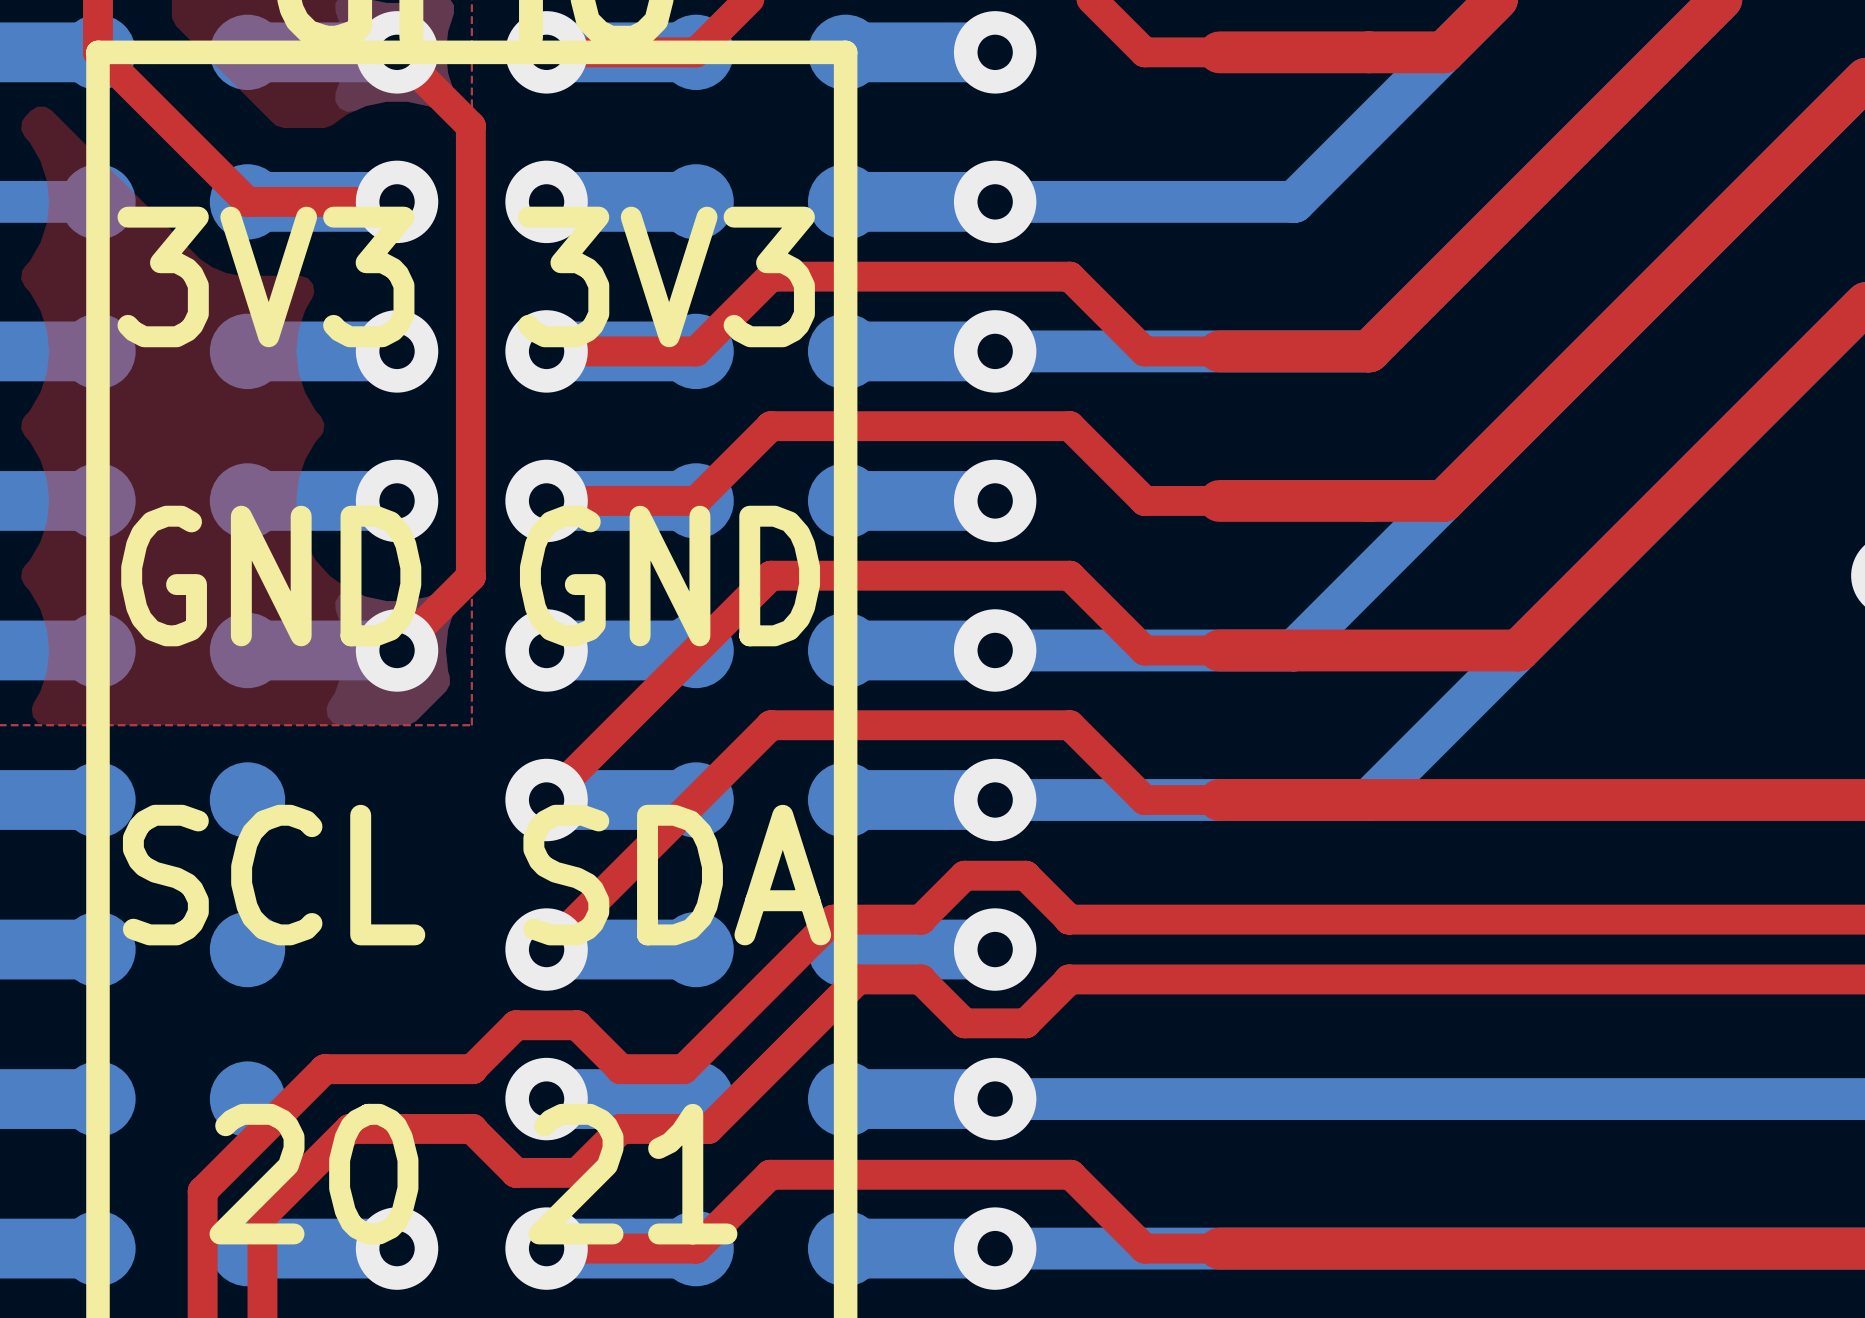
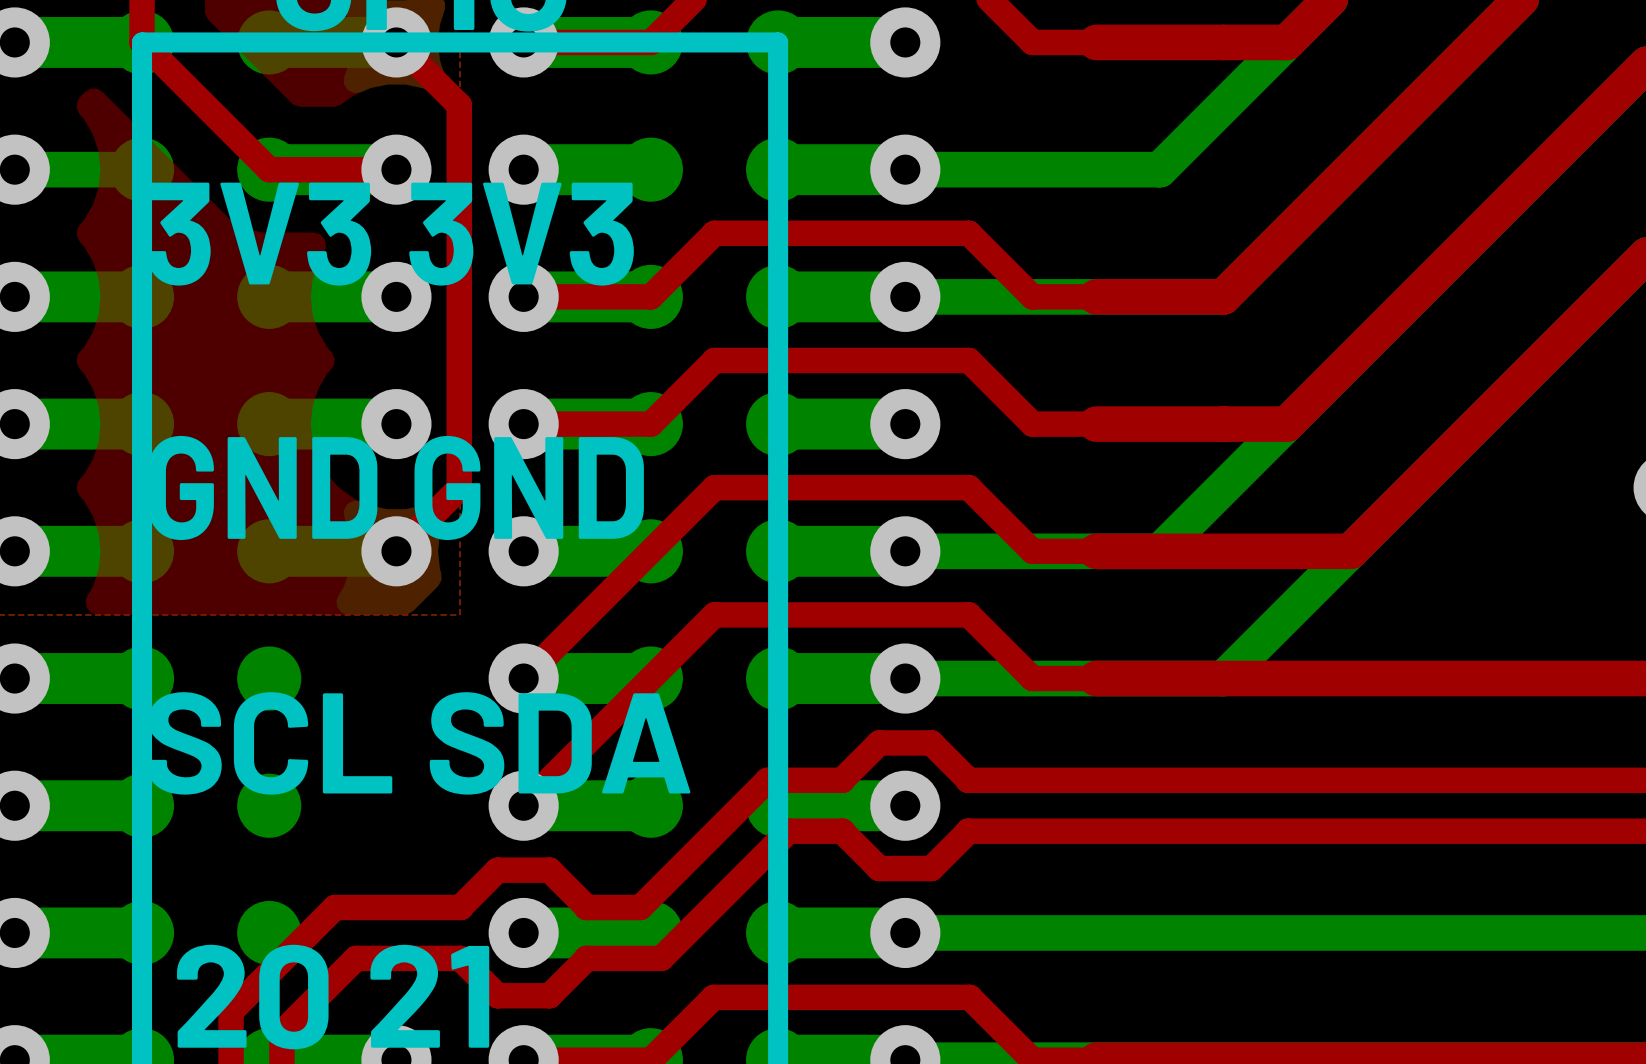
text position: SCL SDA (477, 875) -> SCL SDA (418, 743)

